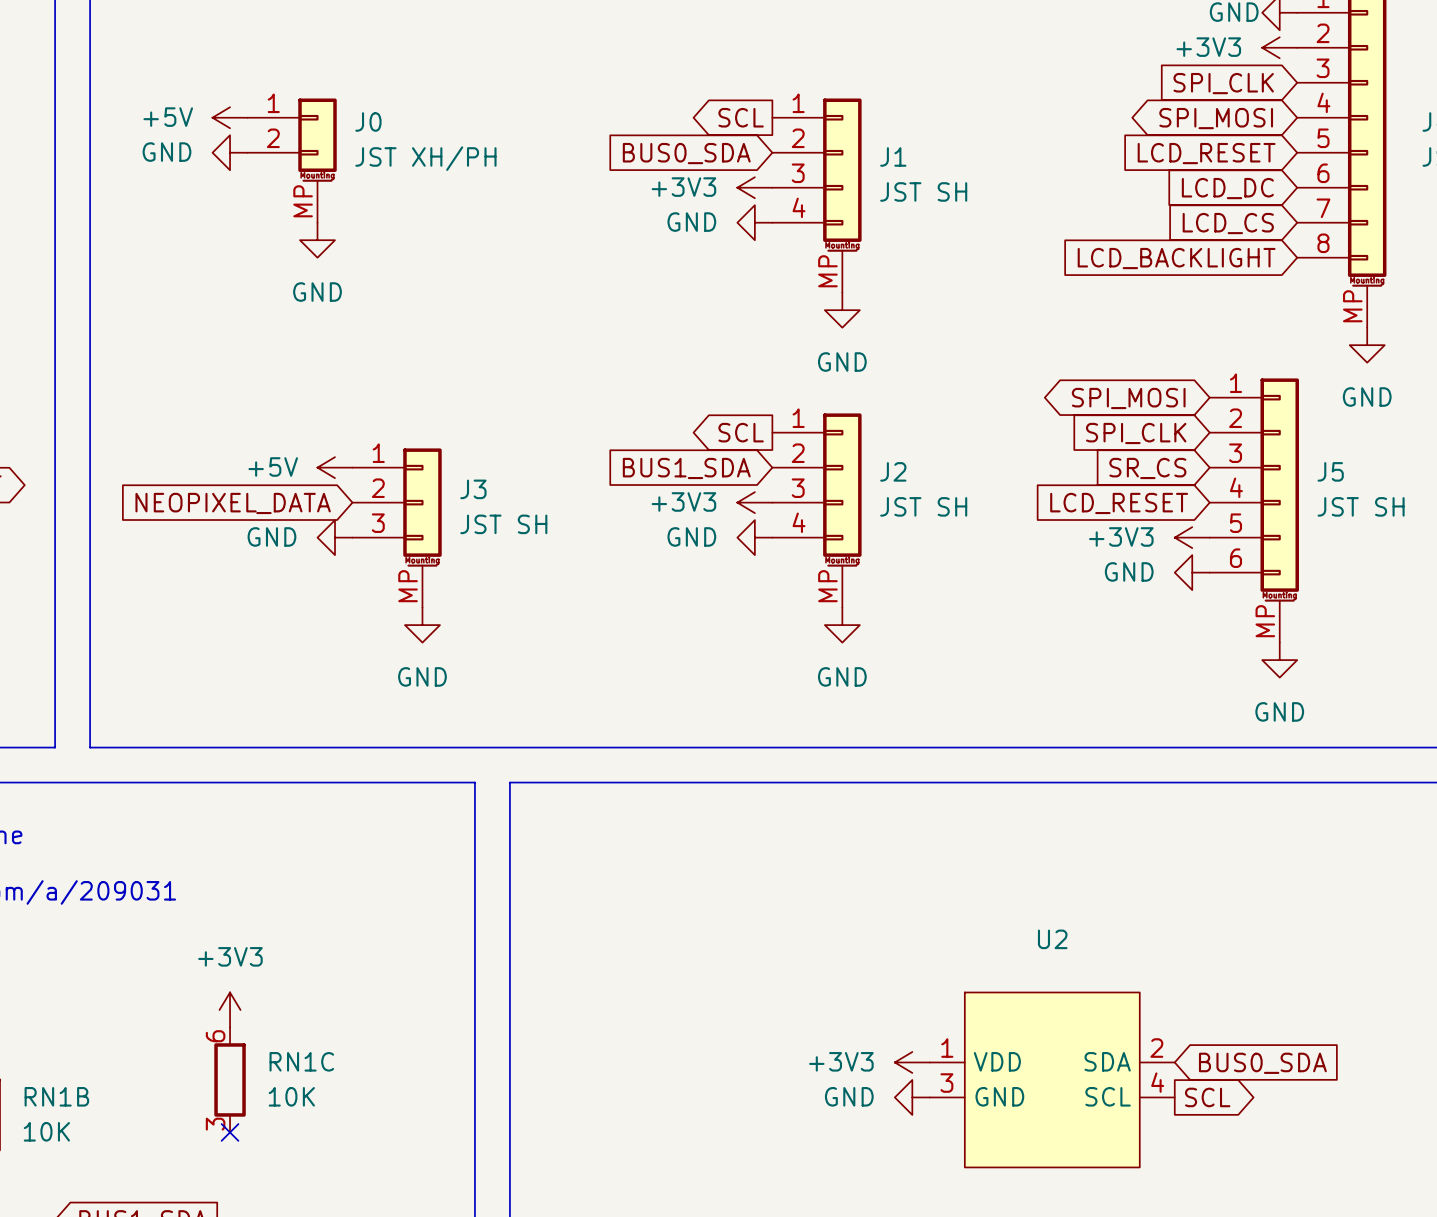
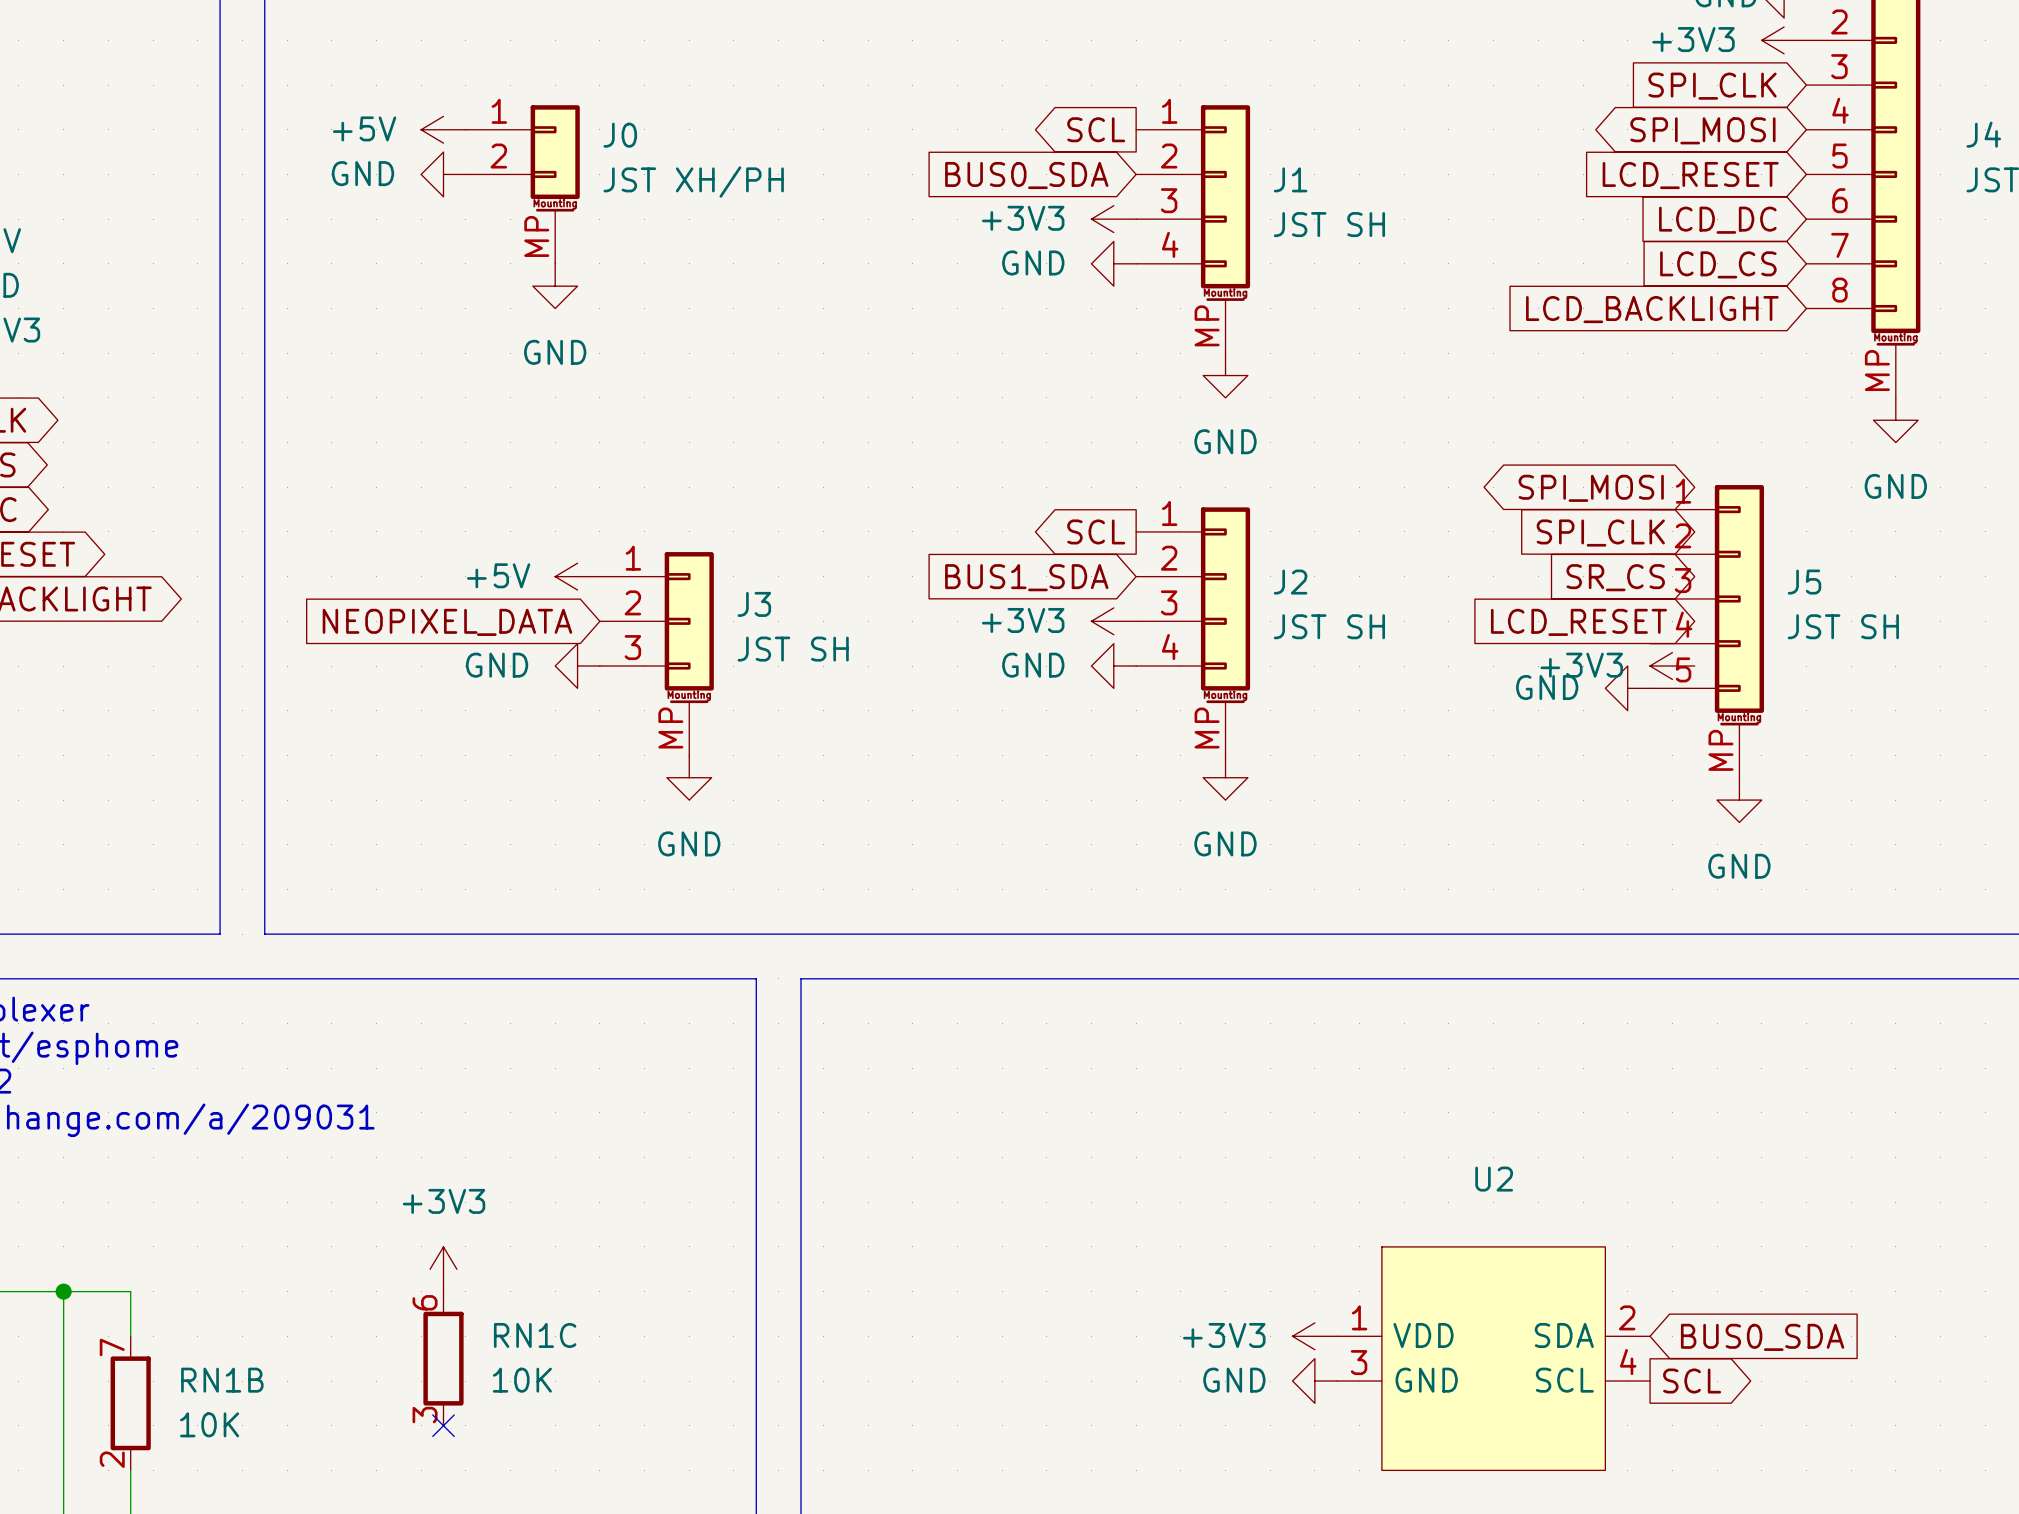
J5 symbol: [1209, 378, 1299, 643] -> [1650, 485, 1764, 778]
power symbol position: GND (1192, 572) -> GND (1627, 688)
power symbol position: GND (1279, 660) -> GND (1739, 800)

